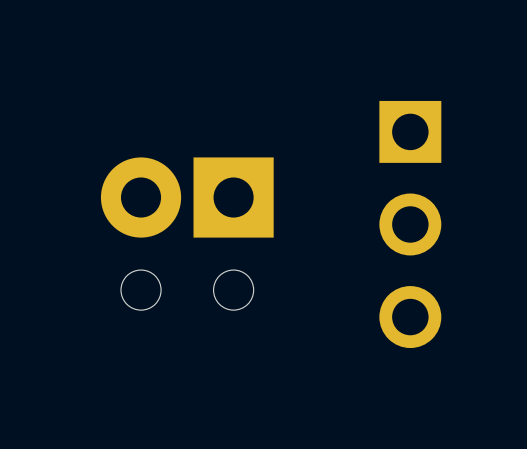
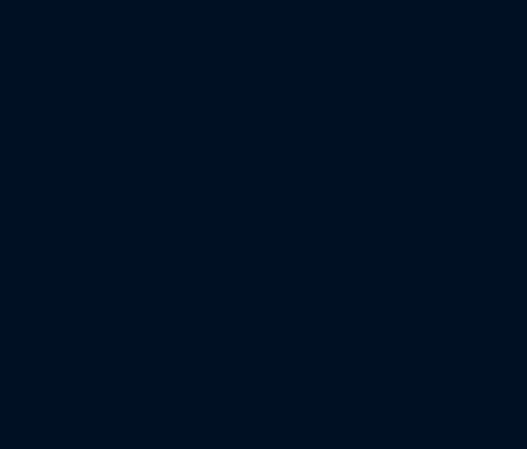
part: (410, 224) -> none
part: (187, 233) -> none

